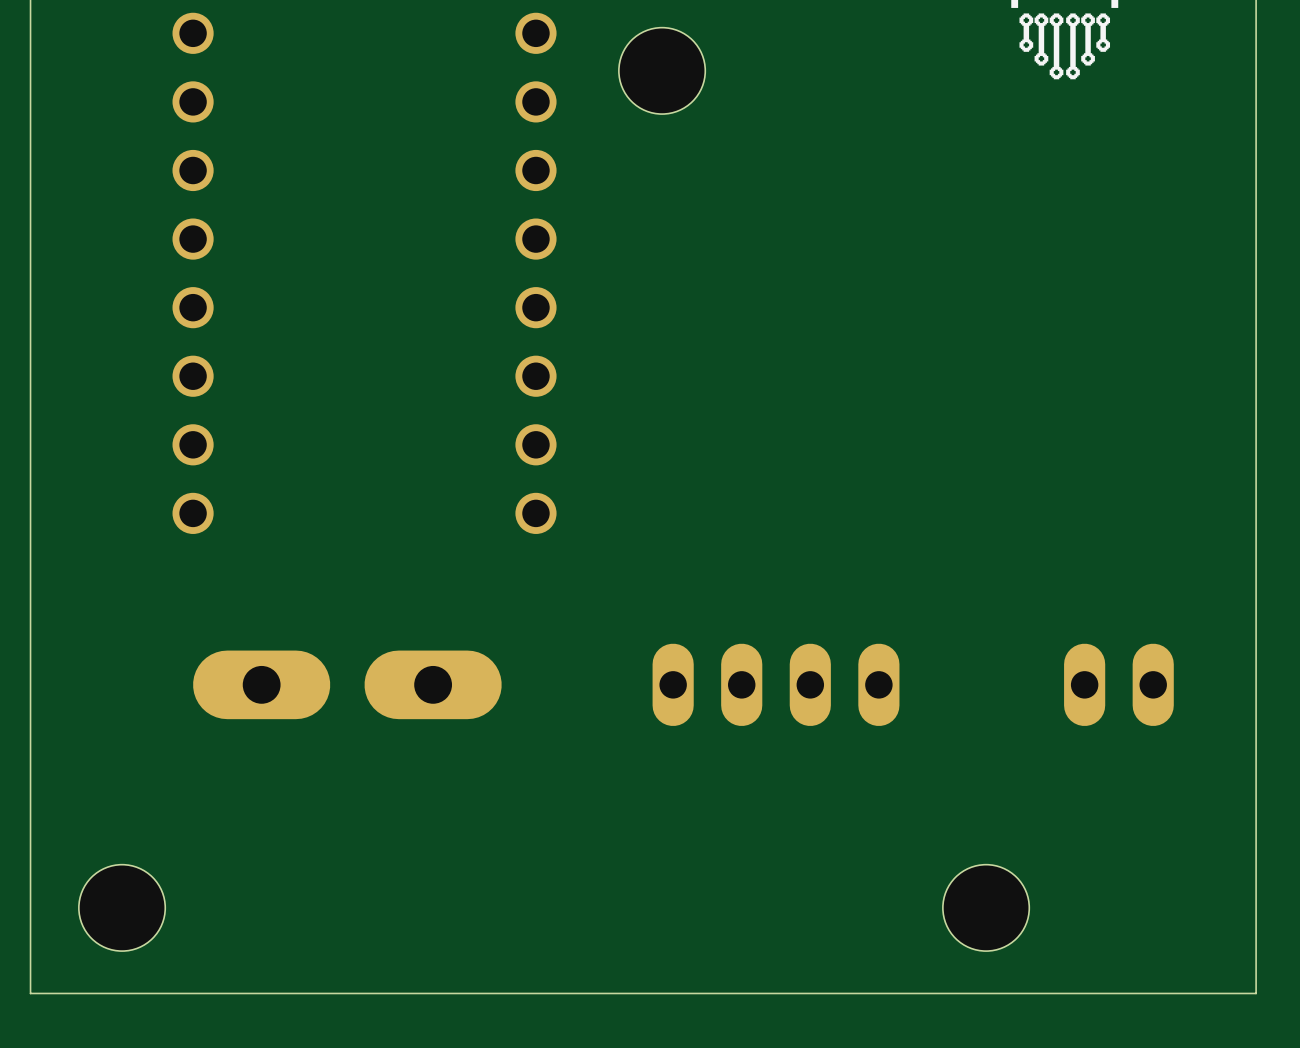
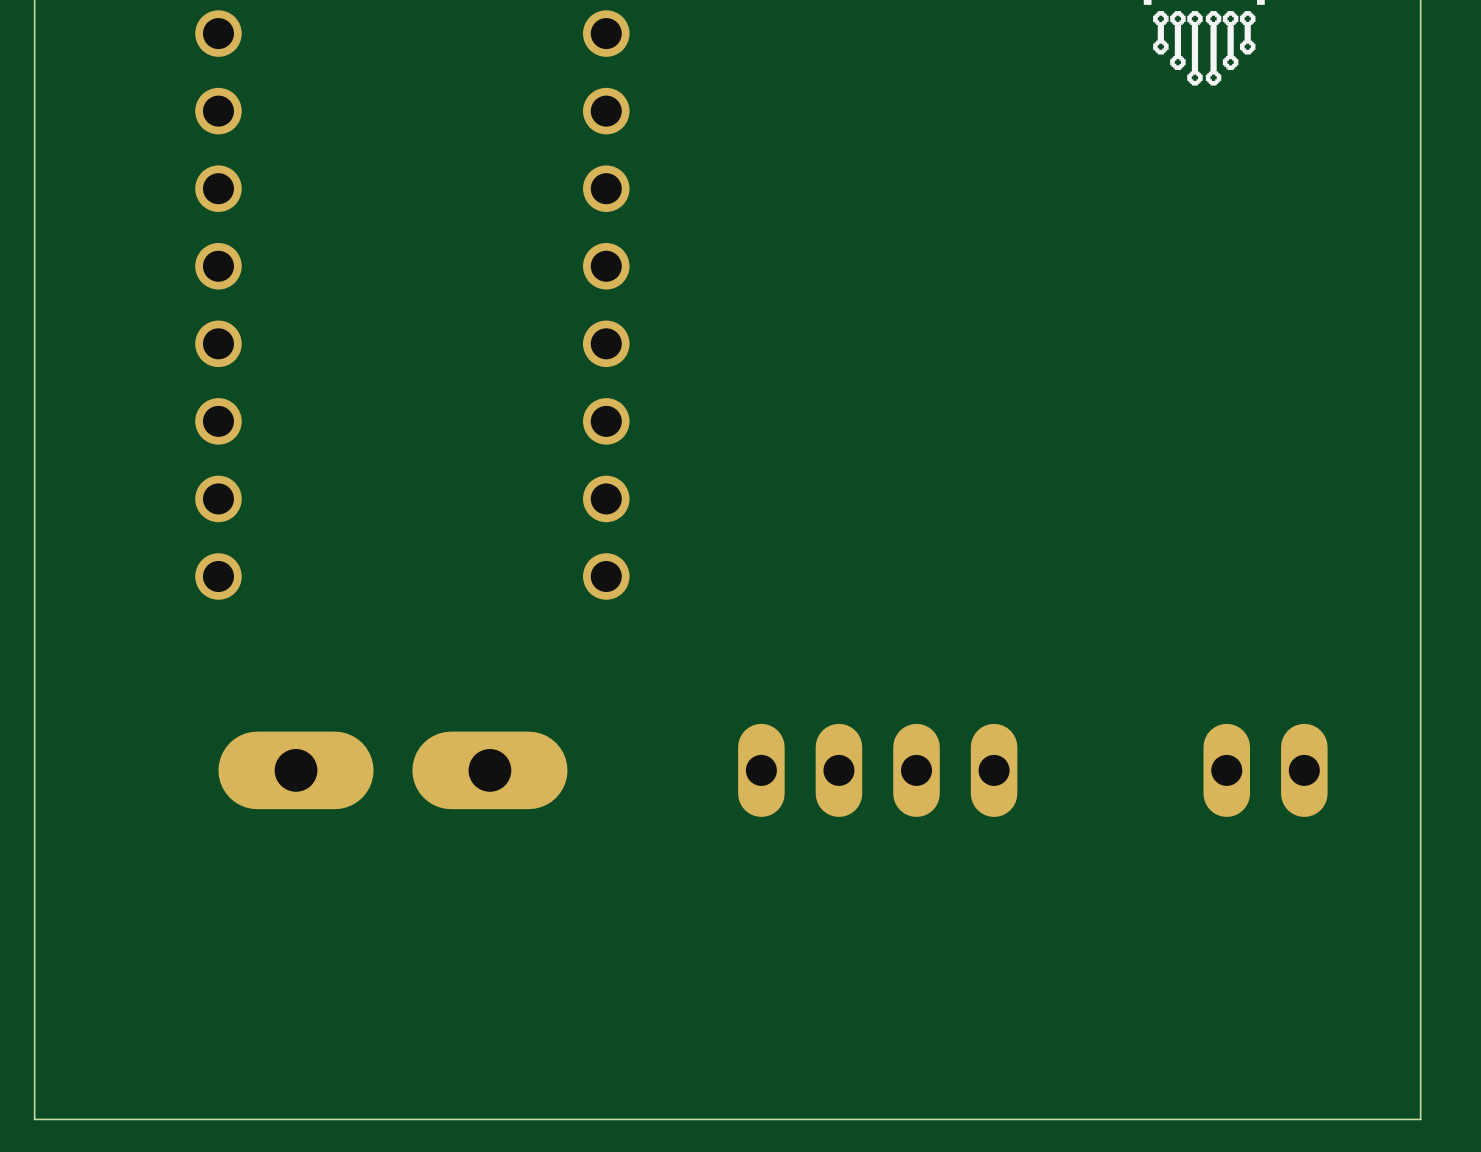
hole: (662, 70) -> none
hole: (122, 907) -> none
hole: (986, 907) -> none

